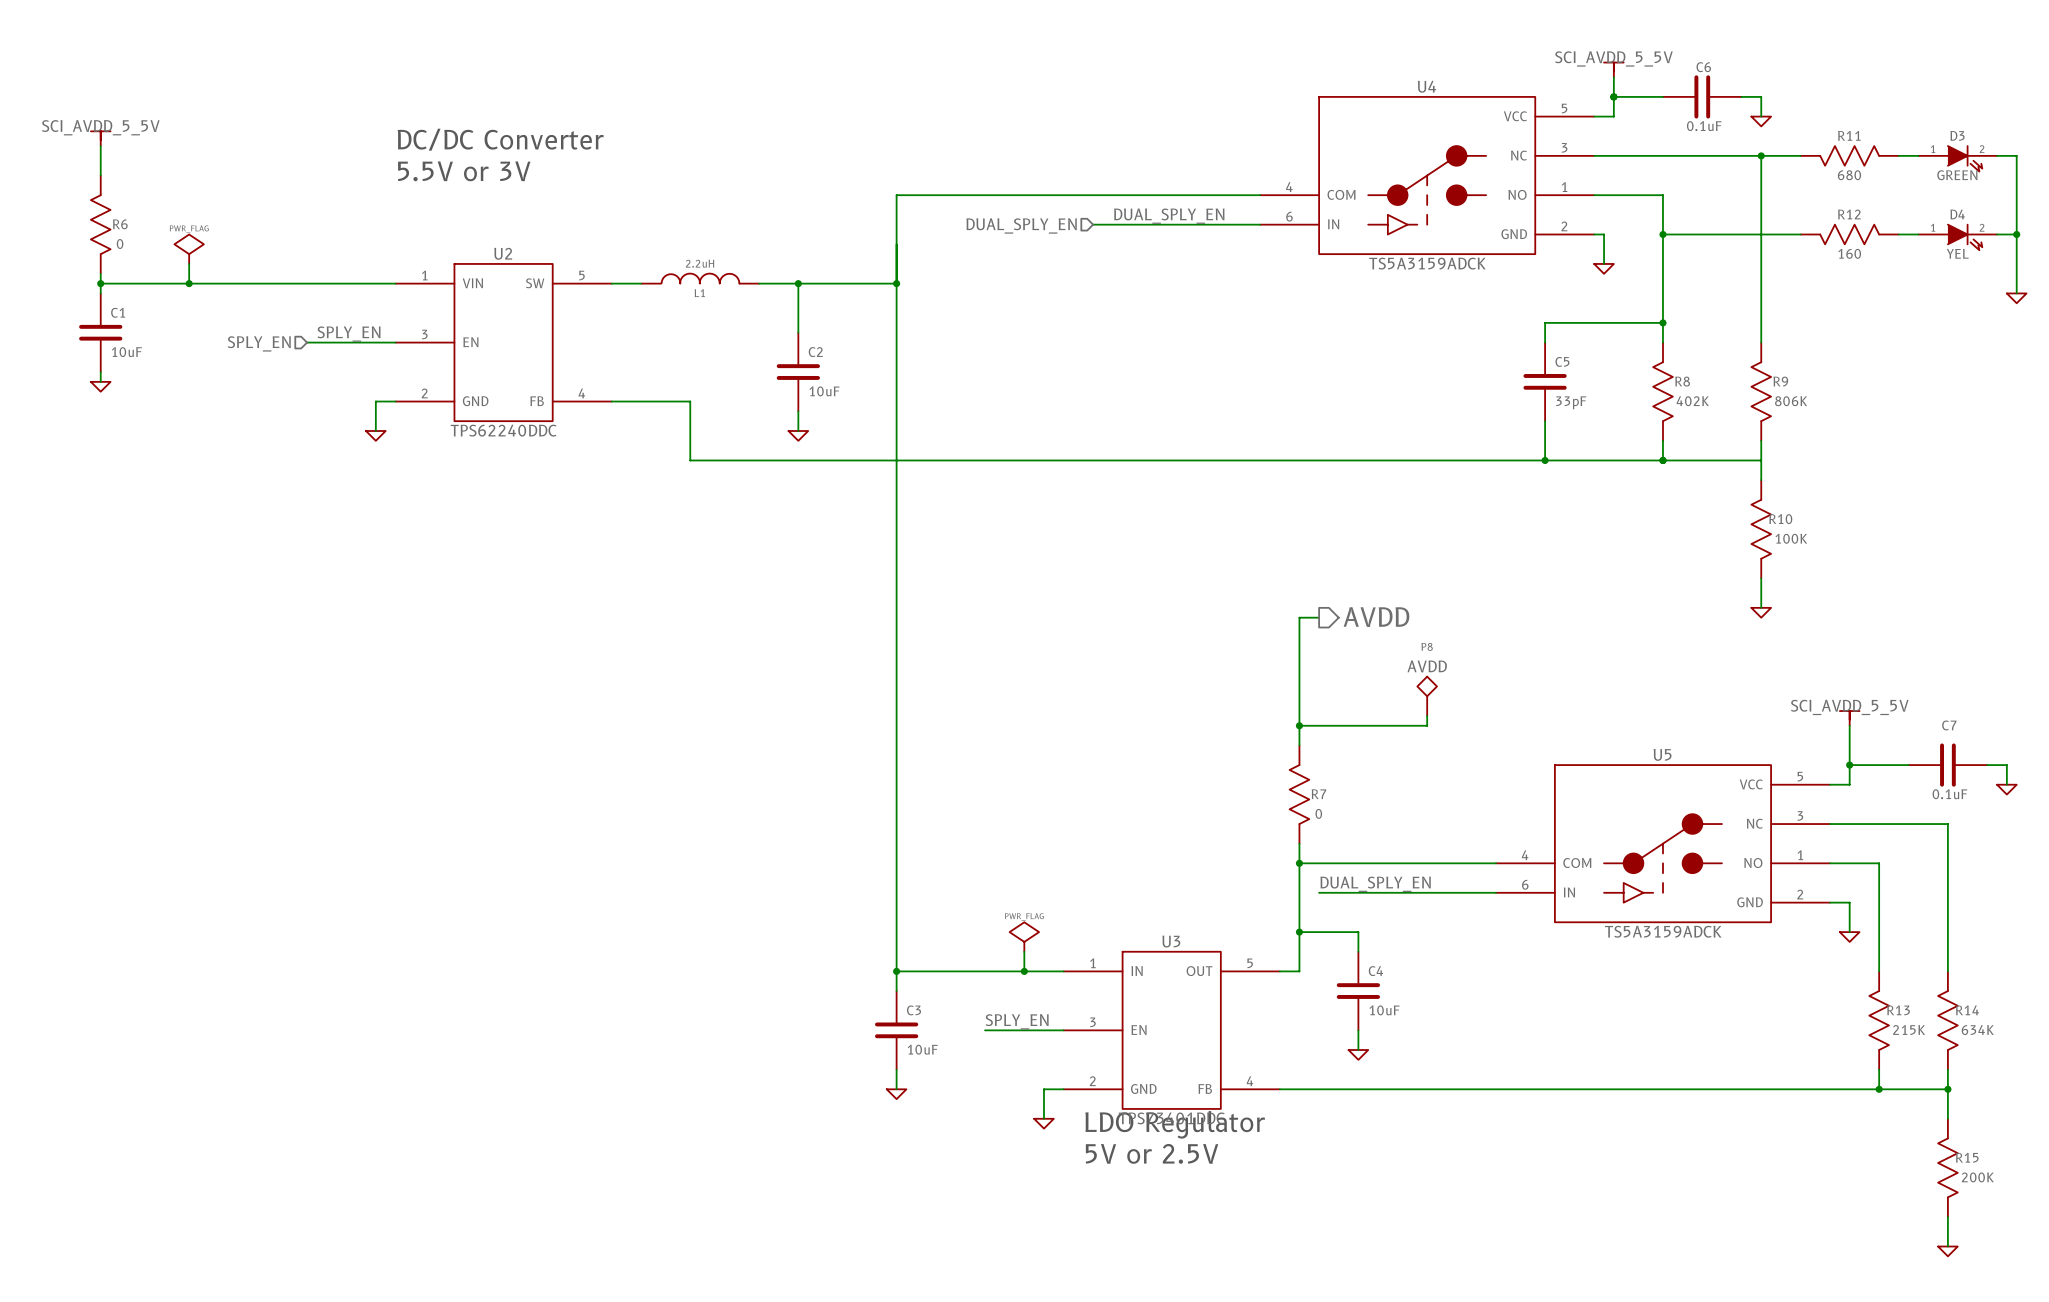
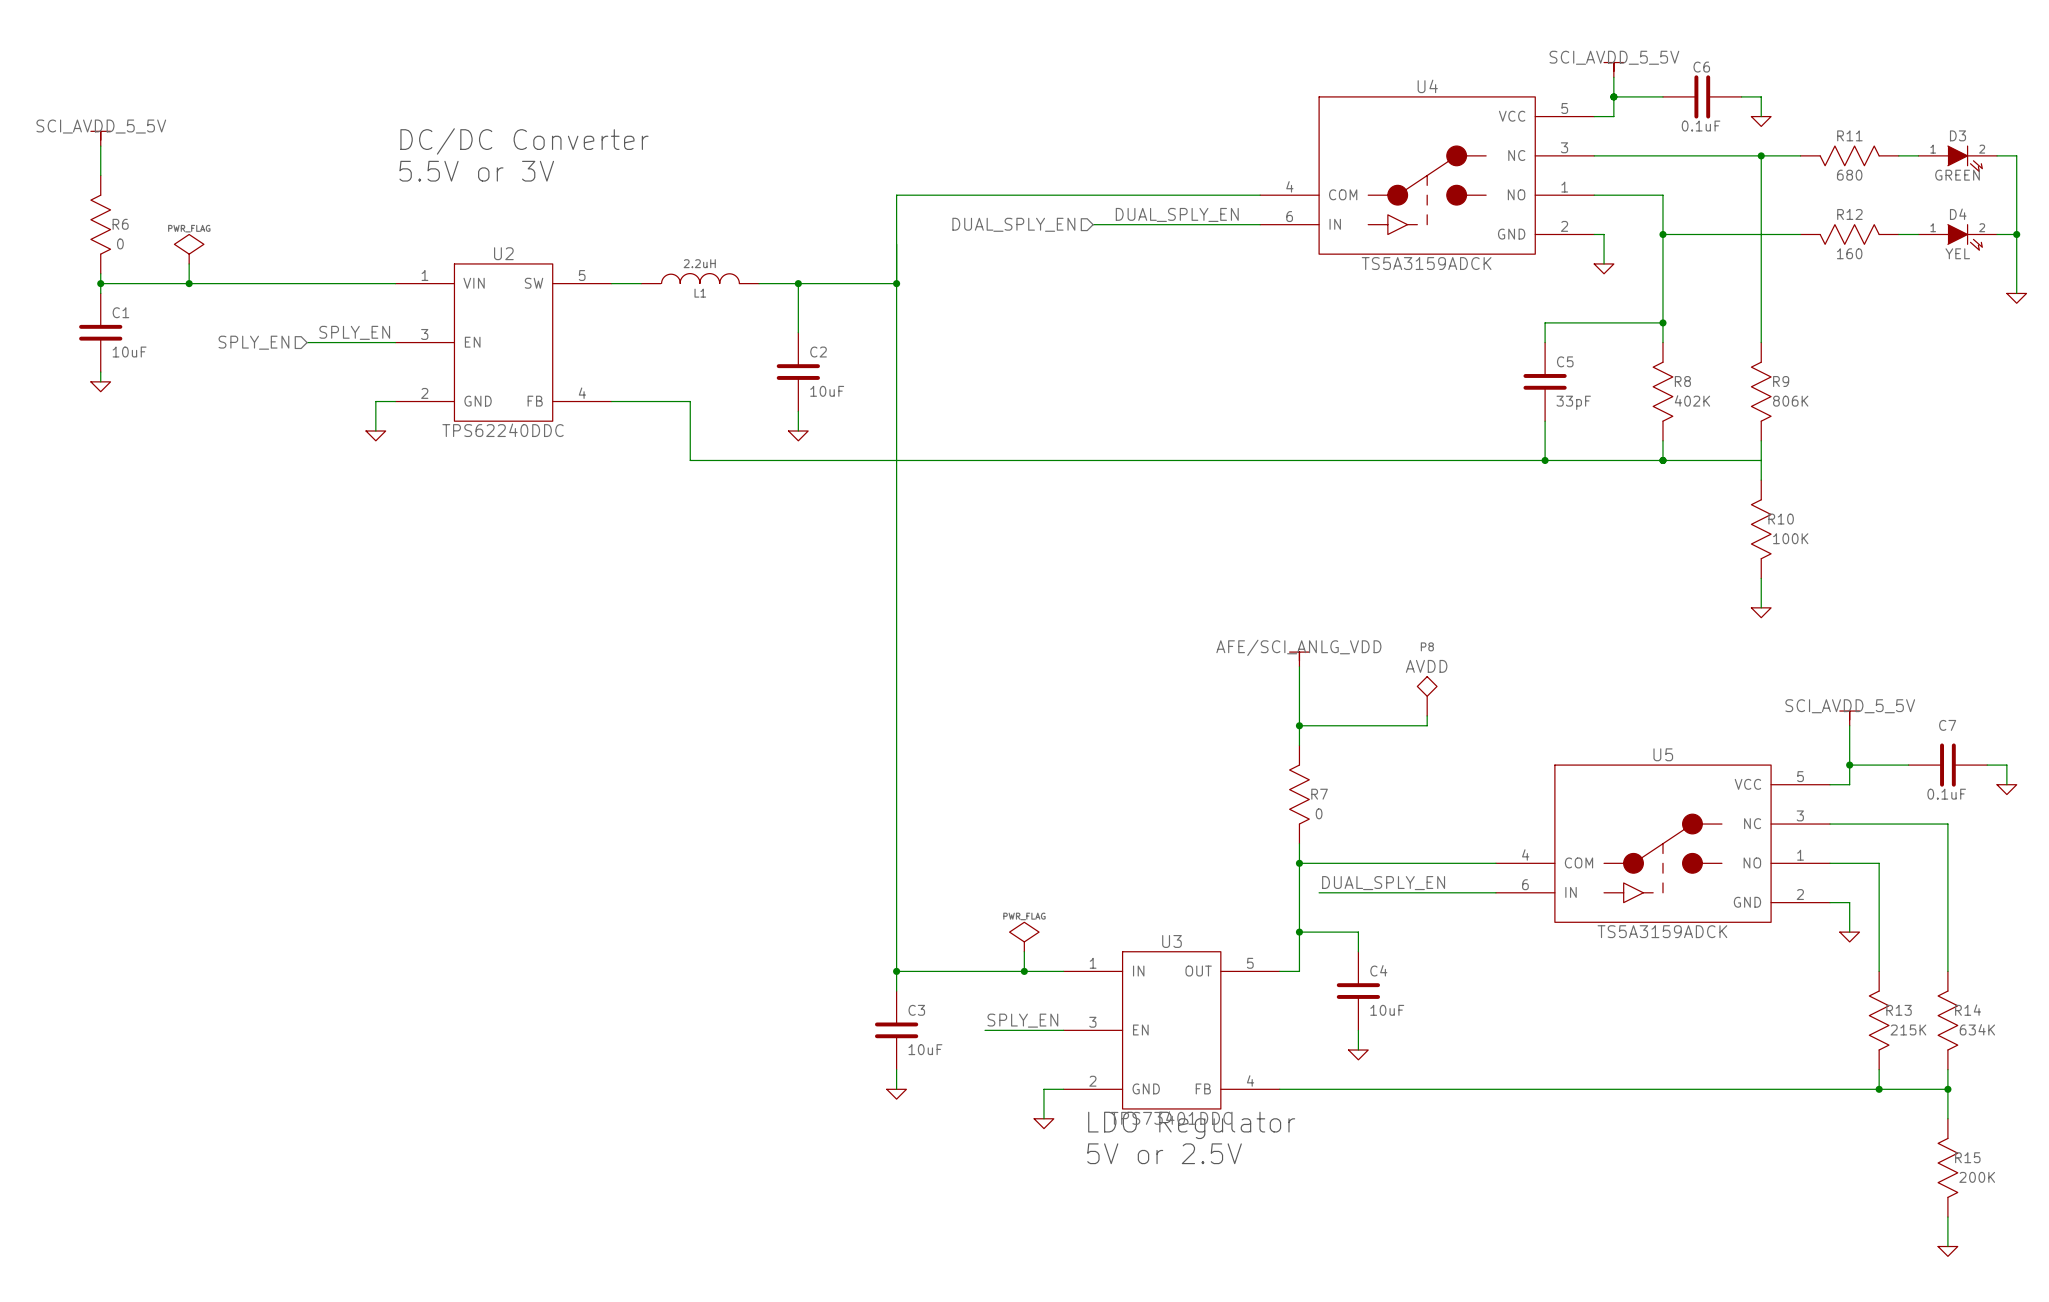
wire: (1319, 617) (1299, 617) (1299, 666) -> none
hierarchical label: AVDD (1376, 617) -> none
power symbol: none -> AFE/SCI_ANLG_VDD (1299, 659)

